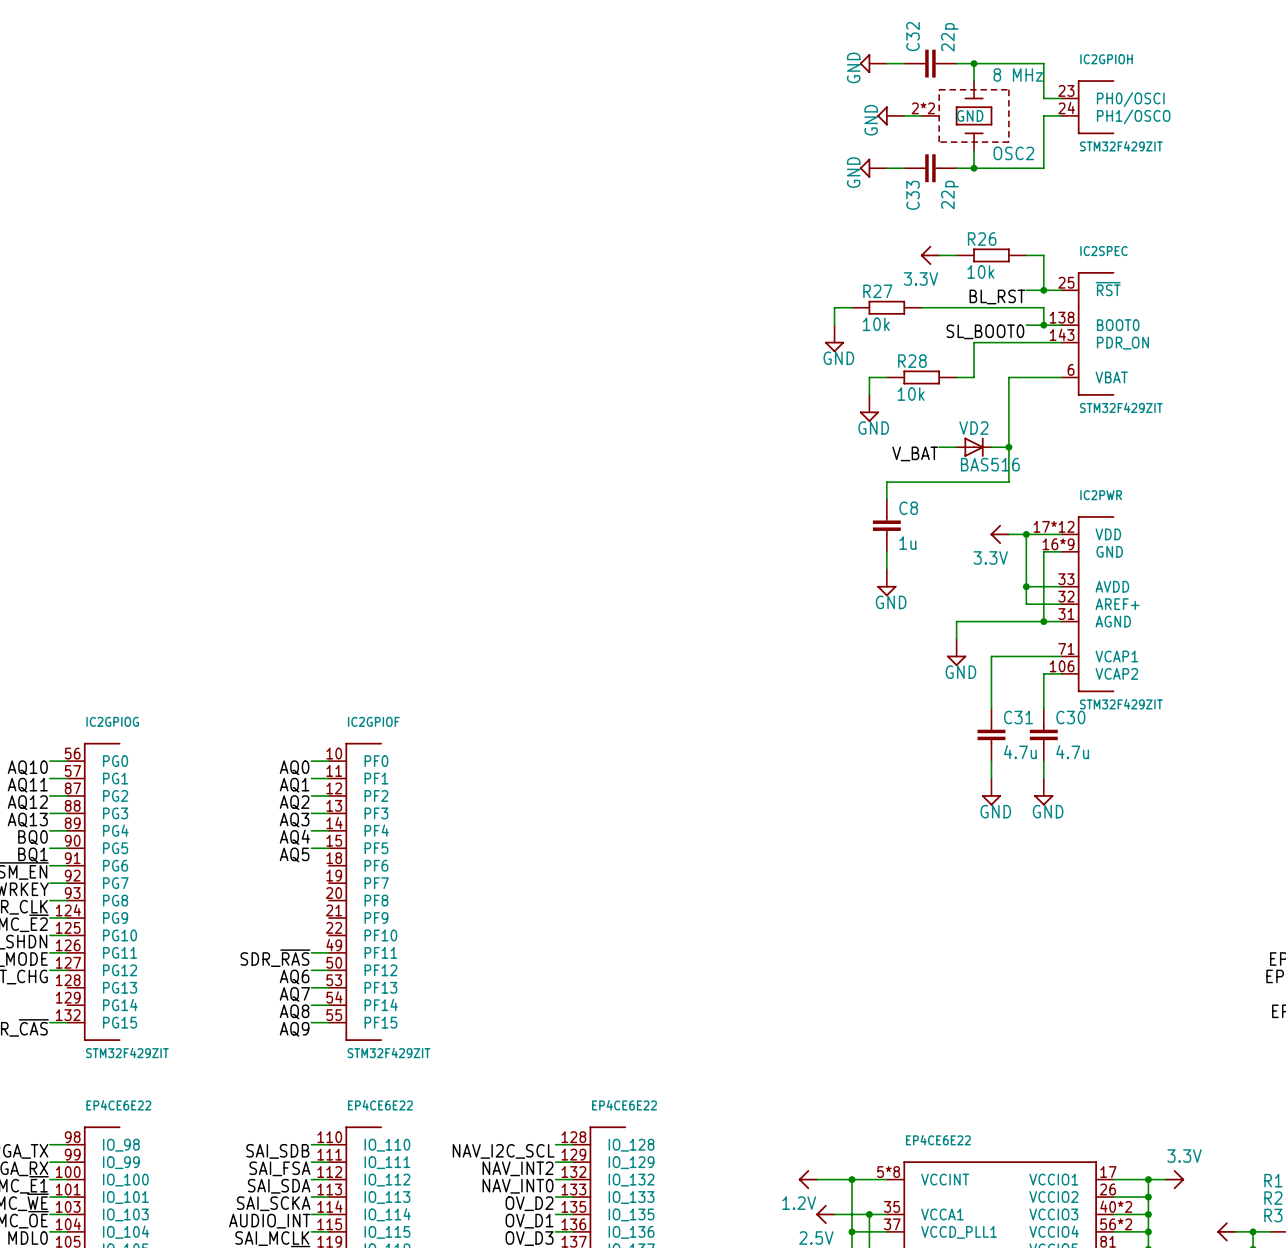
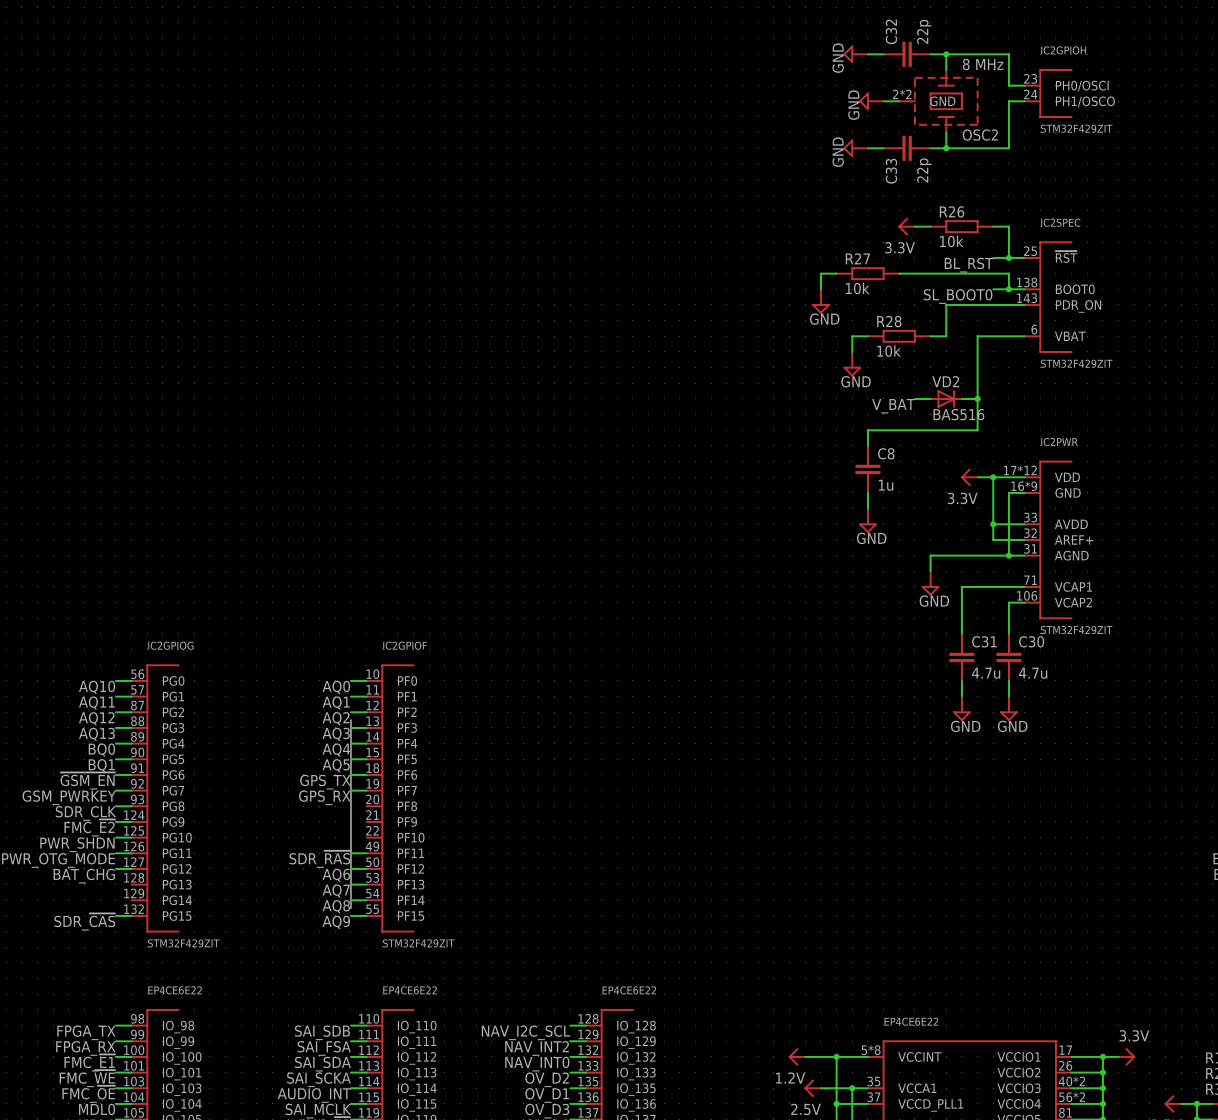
bus: none -> (350, 720) (350, 908)
wire: none -> (350, 774) (366, 774)
label: none -> GPS_TX (325, 782)
wire: none -> (350, 790) (366, 790)
label: none -> GPS_RX (324, 797)

